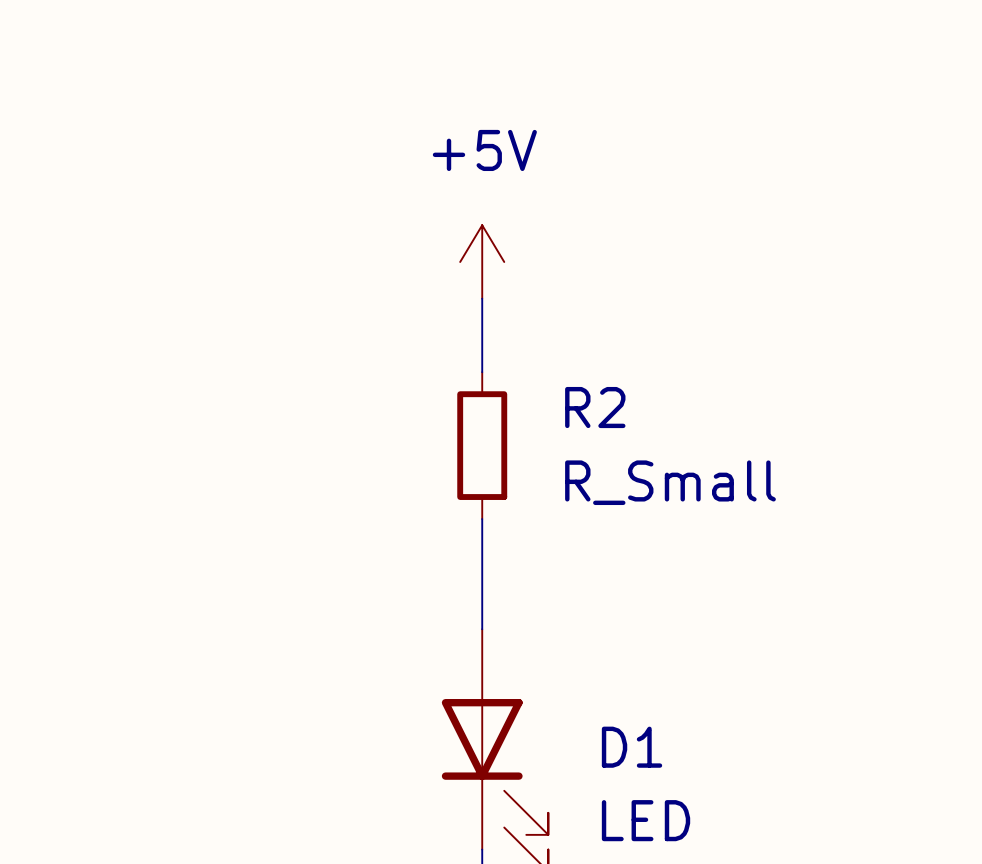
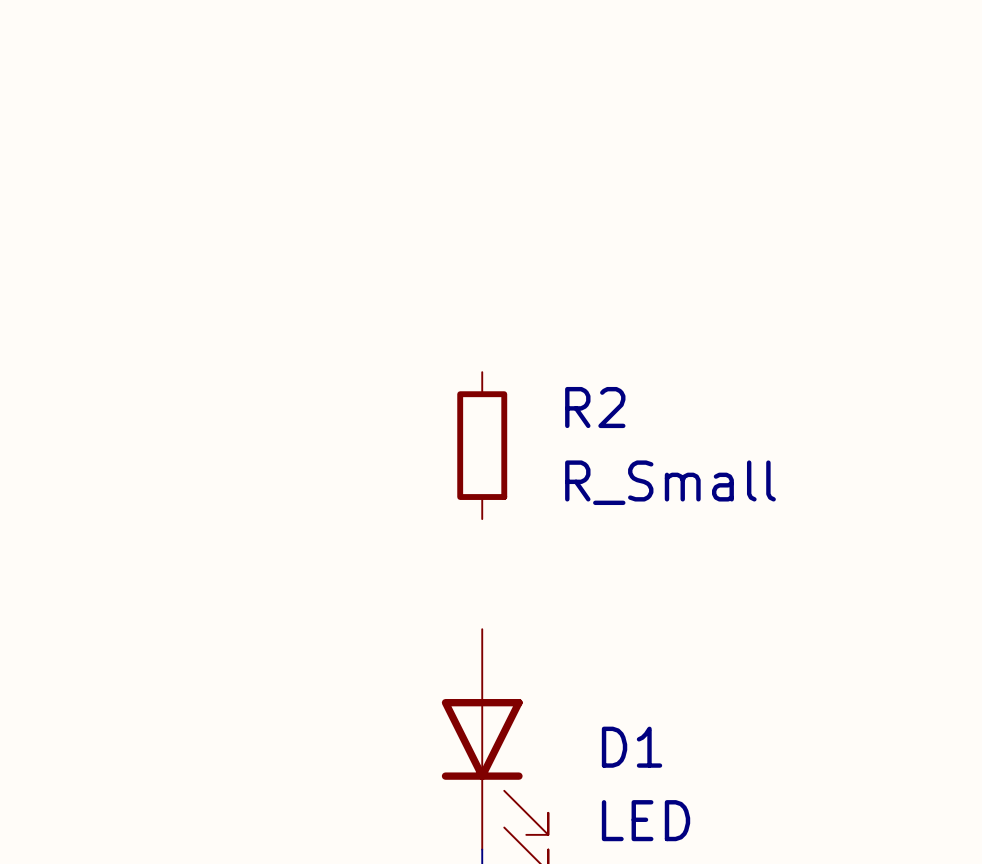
power symbol: +5V (482, 262) -> none
wire: (482, 298) (482, 372) -> none
wire: (482, 519) (482, 629) -> none

